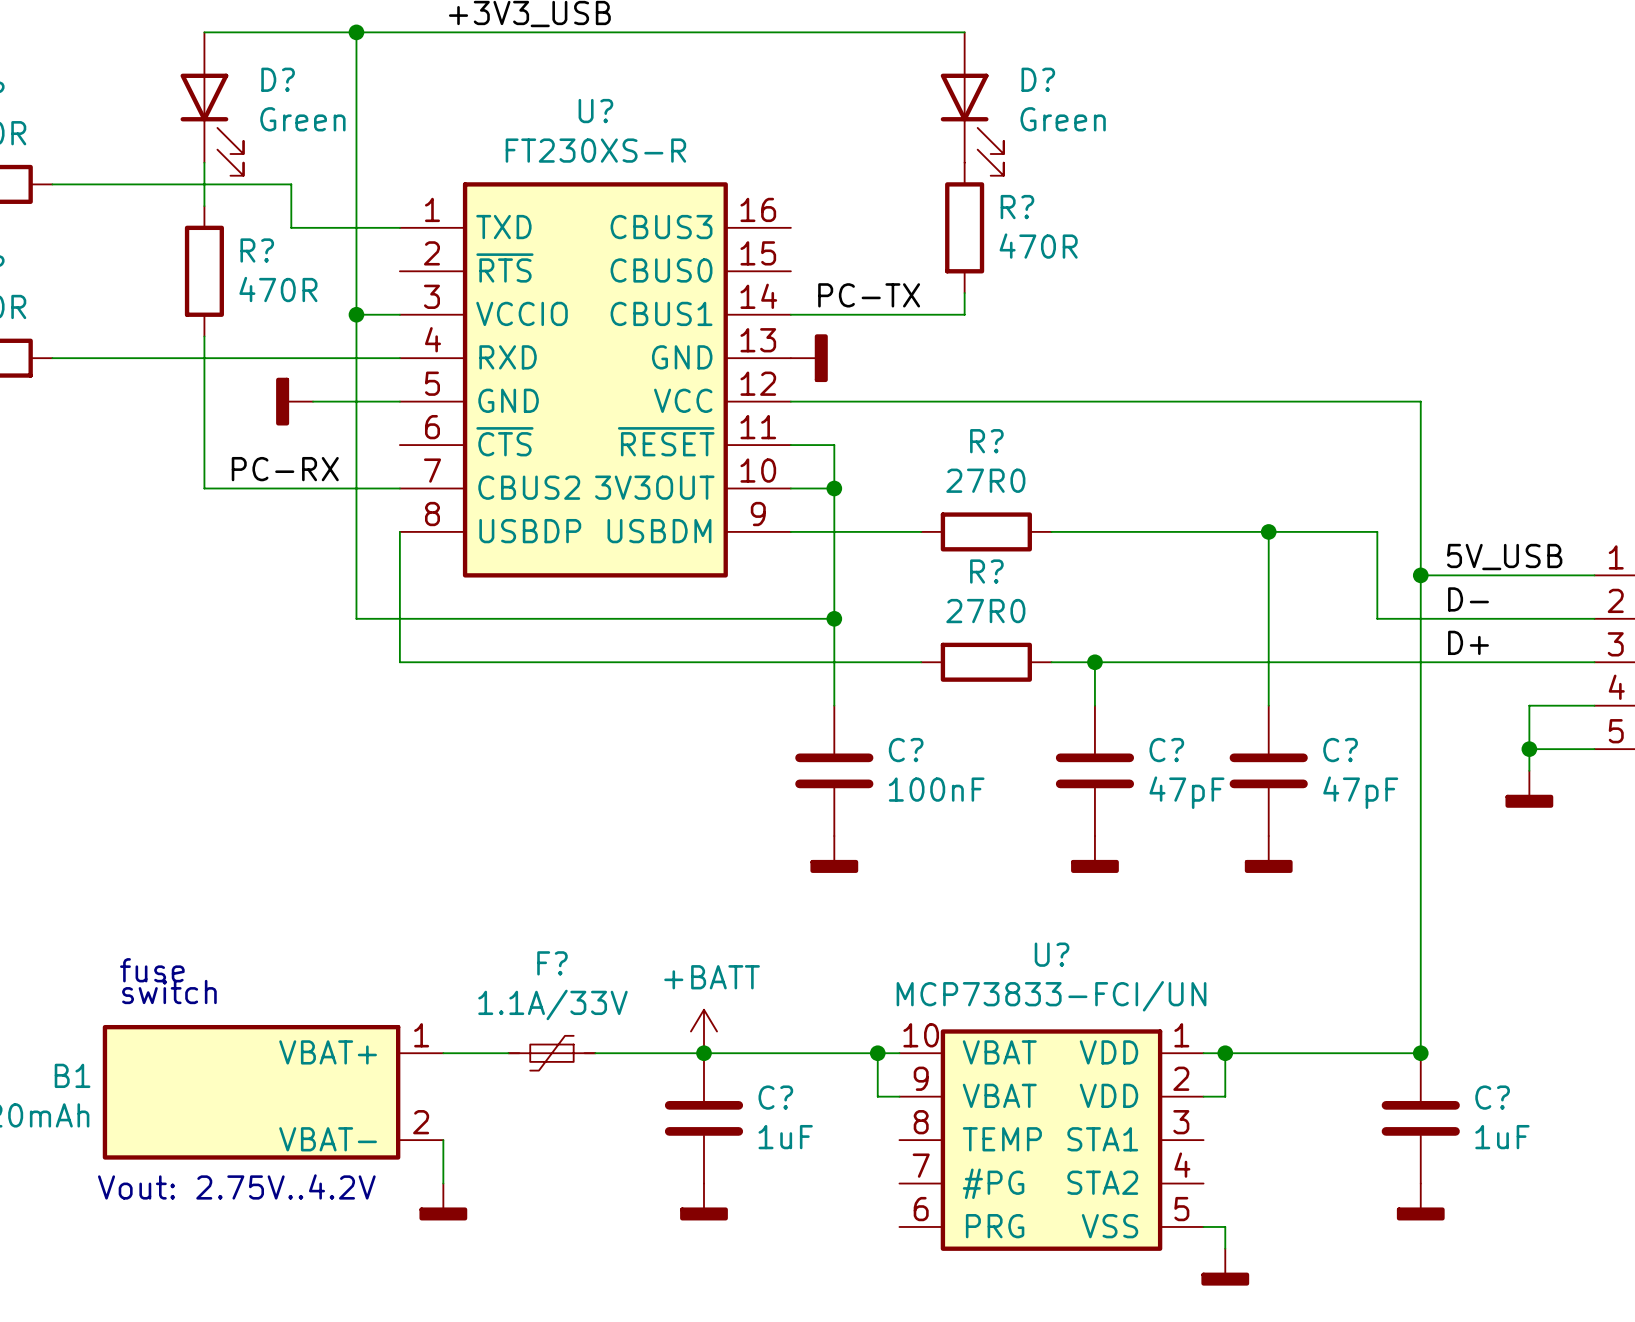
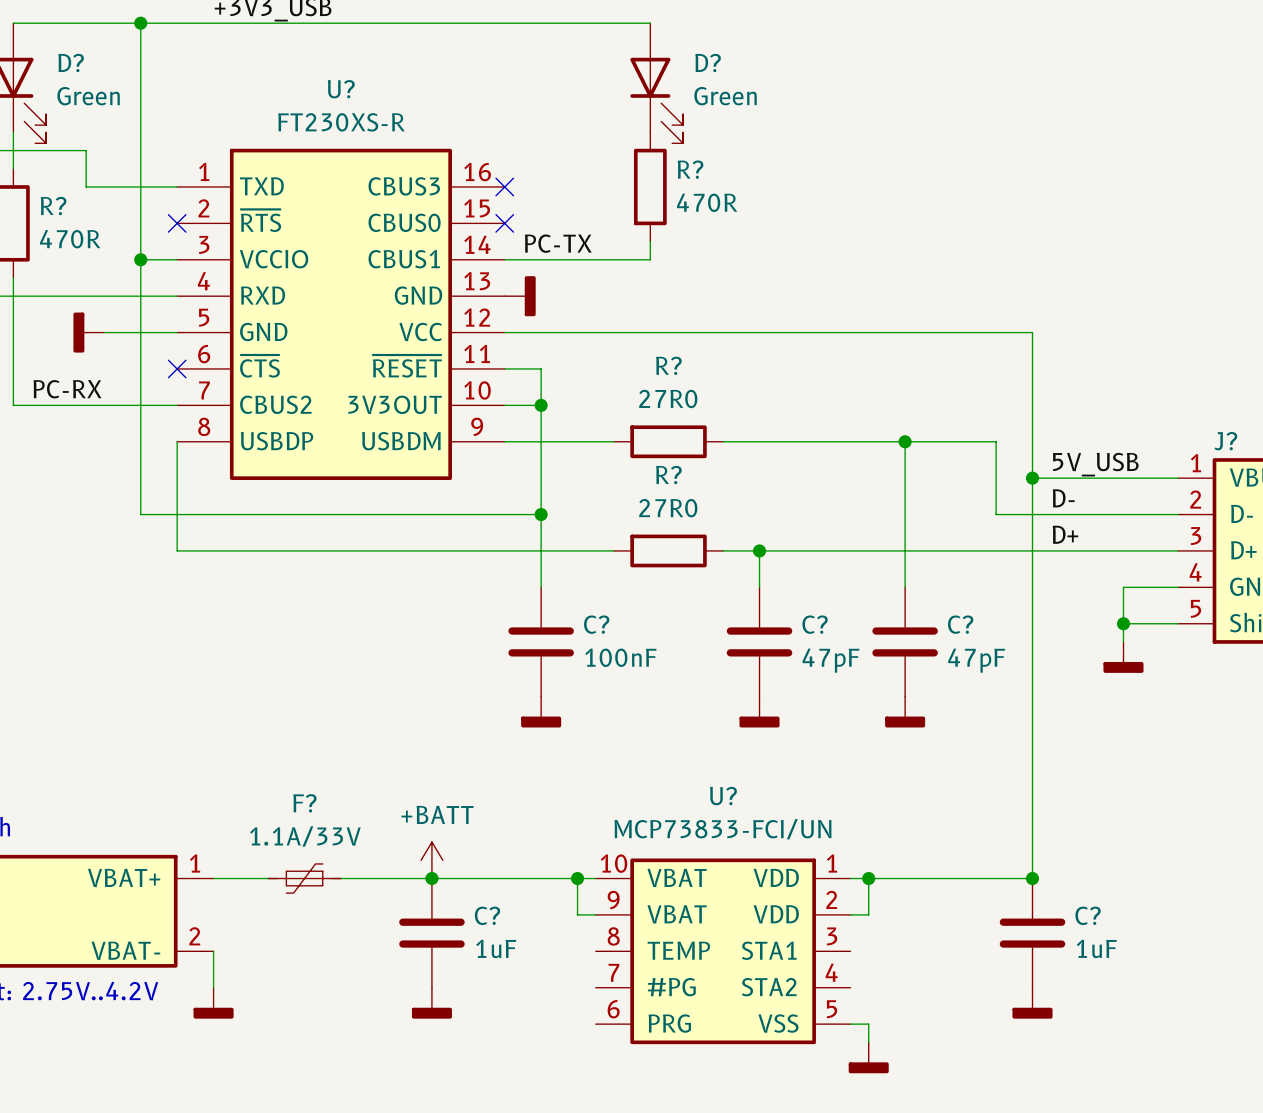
no-connect mark: none -> (504, 186)
no-connect mark: none -> (177, 223)
no-connect mark: none -> (504, 223)
no-connect mark: none -> (177, 368)

